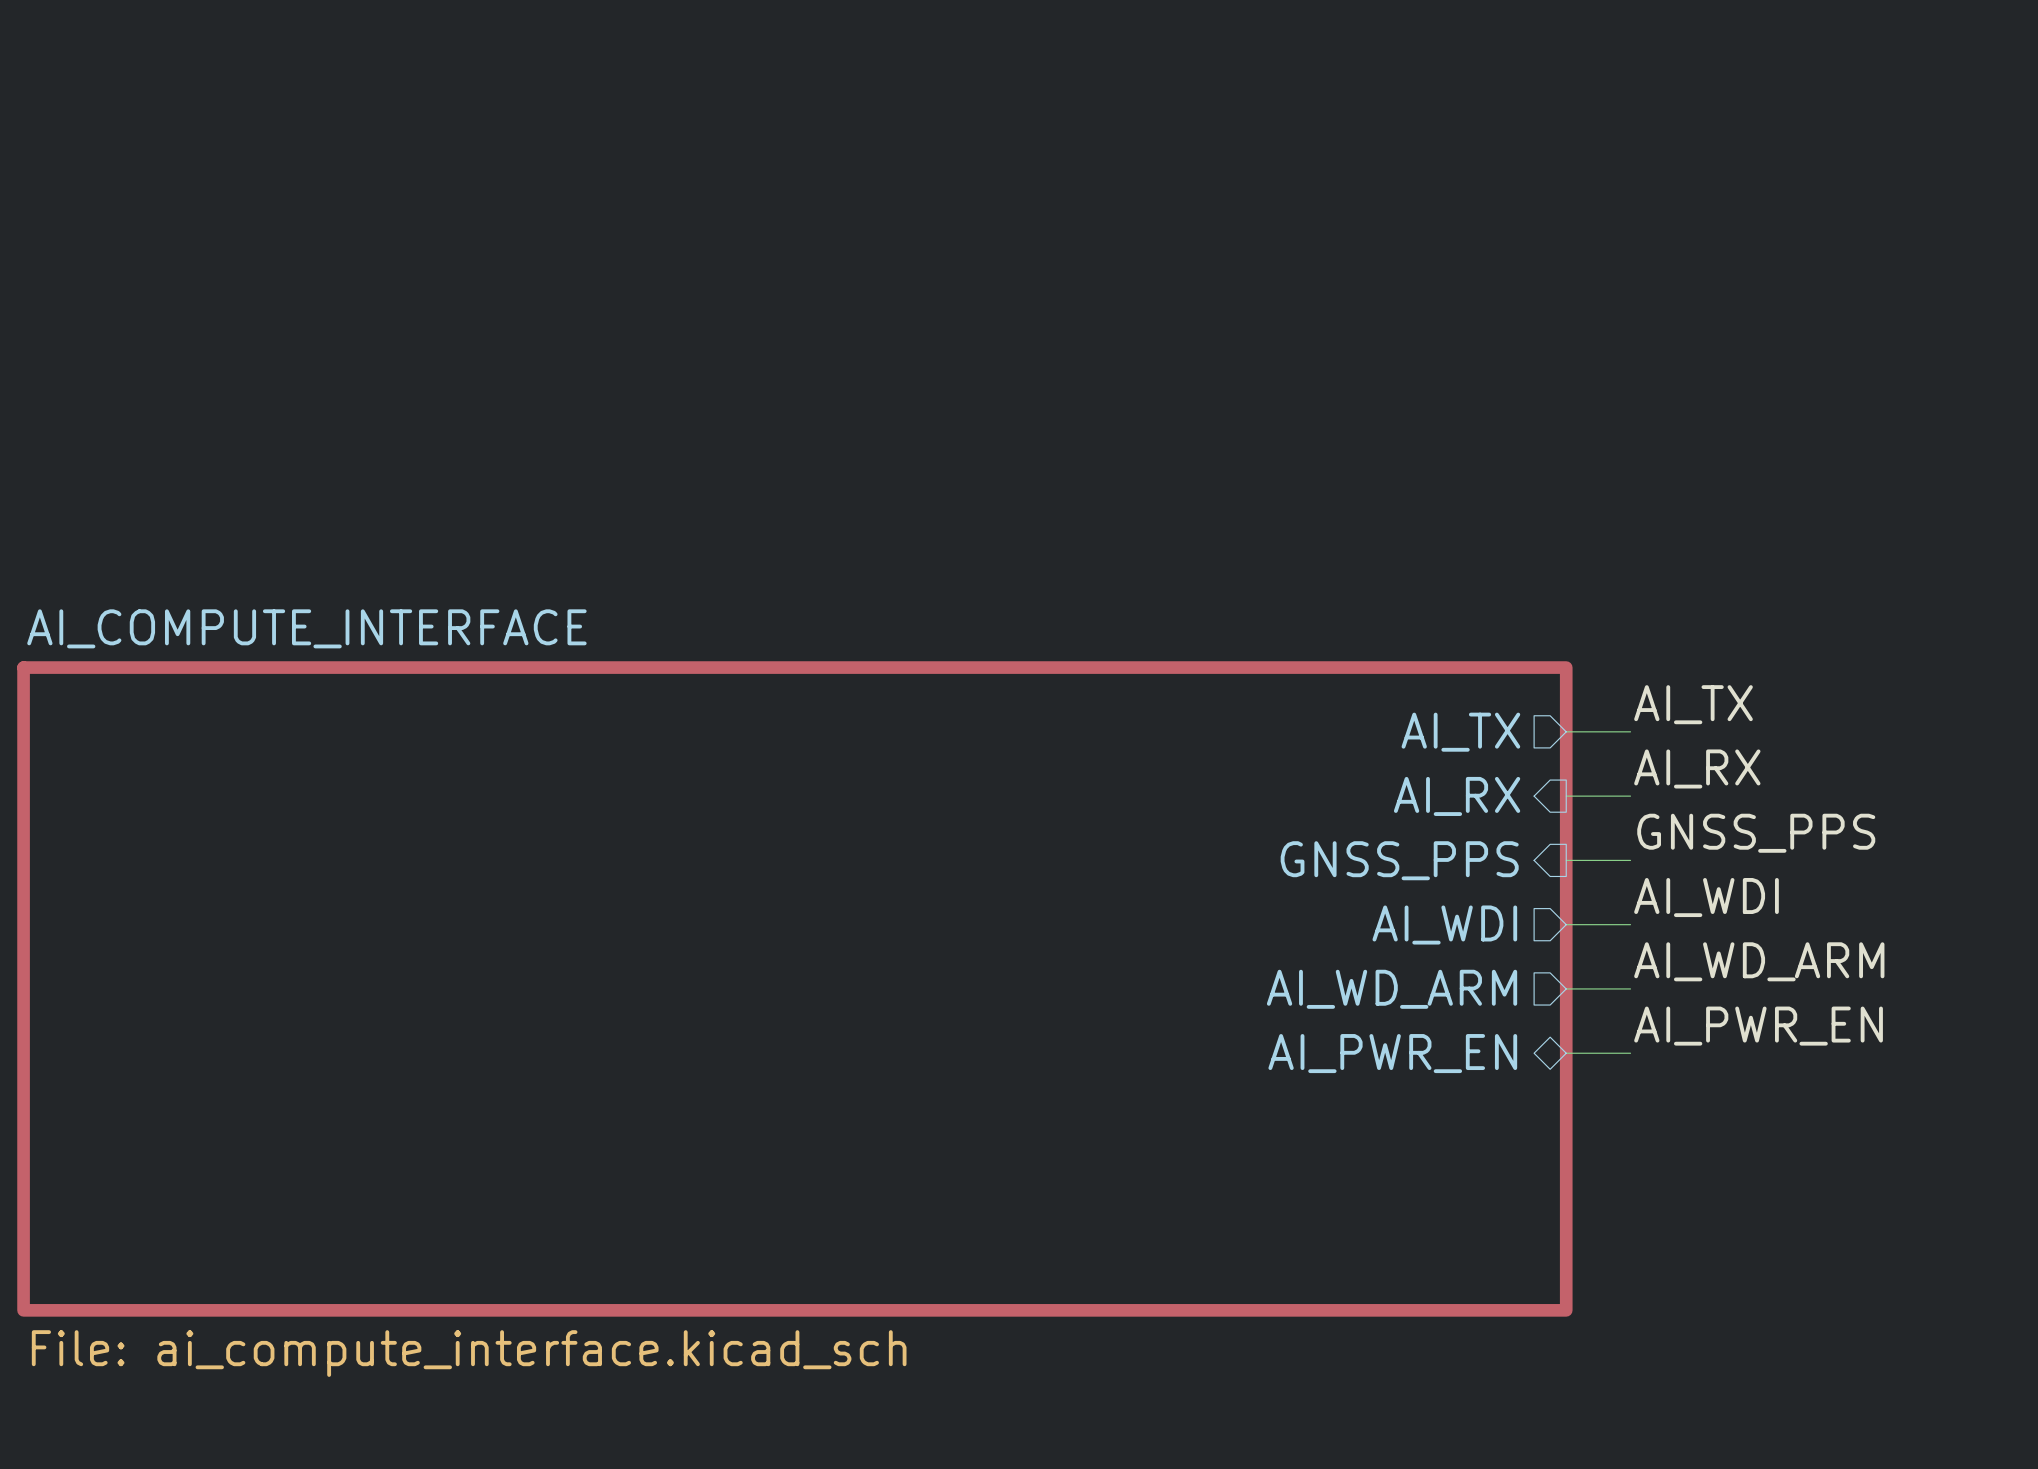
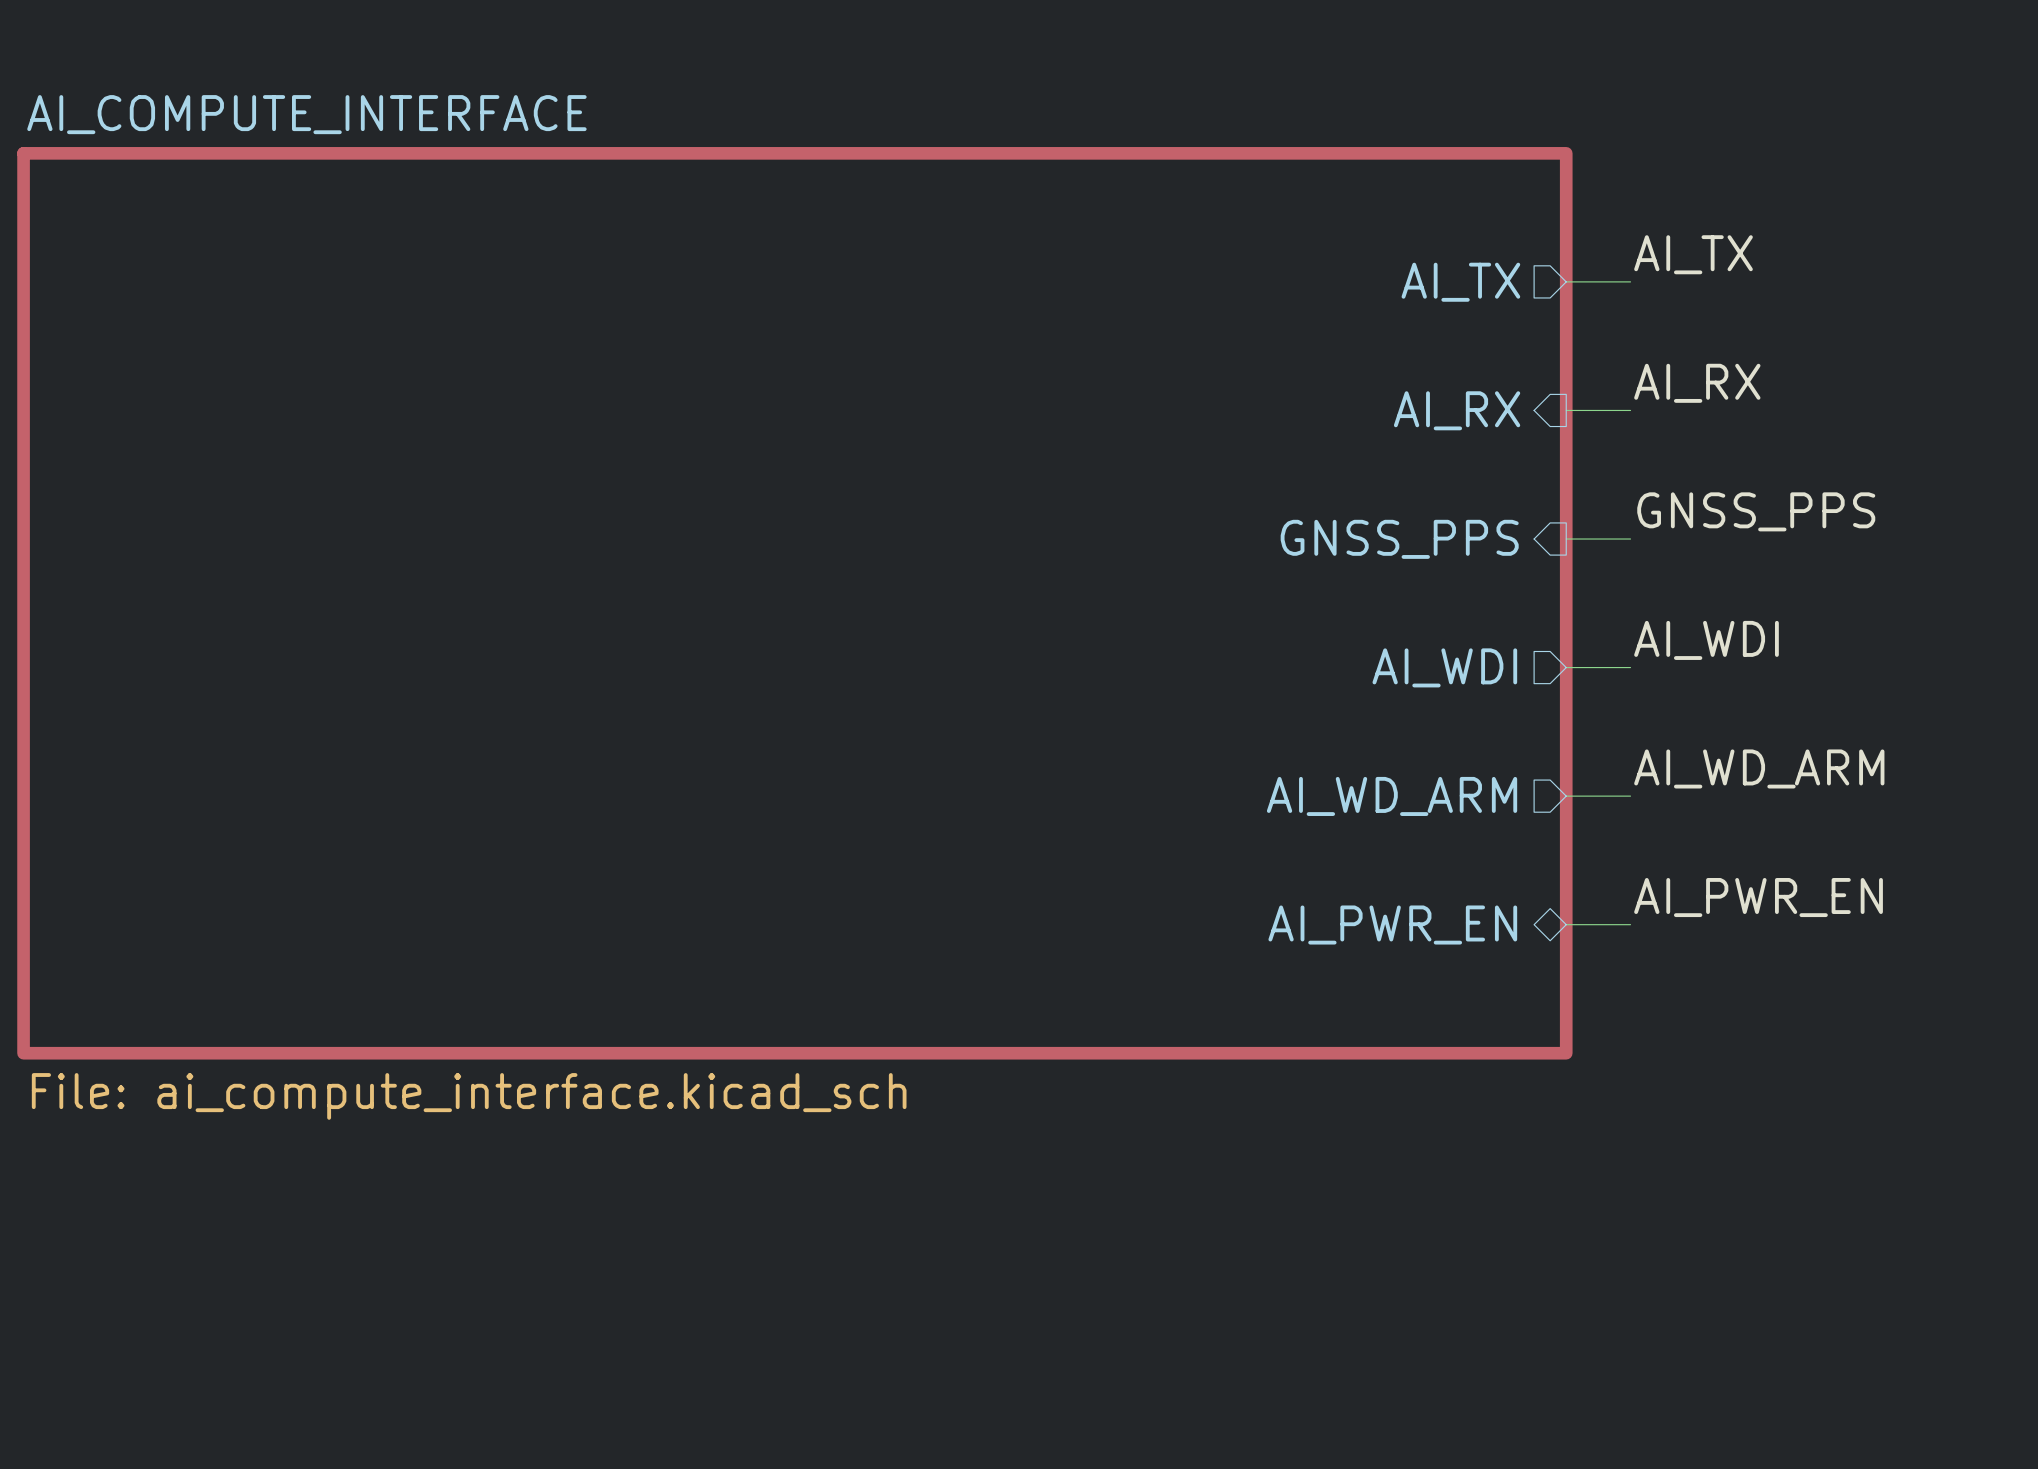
wire: none -> (1566, 281) (1630, 281)
label: none -> AI_RX (1697, 383)
sheet pin: none -> AI_RX (1457, 410)
sheet AI_COMPUTE_INTERFACE: none -> File: ai_compute_interface.kicad_sch (794, 603)
label: none -> AI_WDI (1706, 640)
sheet pin: none -> AI_WDI (1444, 667)
label position: AI_TX (1693, 704) -> AI_TX (1693, 254)
wire: (1566, 731) (1630, 731) -> (1566, 410) (1630, 410)
sheet pin position: AI_TX (1460, 732) -> AI_TX (1460, 282)
label: AI_RX (1697, 768) -> AI_WD_ARM (1759, 768)
sheet pin shape: input (1457, 796) -> output (1392, 796)
sheet pin: AI_RX (1457, 796) -> AI_WD_ARM (1392, 796)
label position: GNSS_PPS (1756, 833) -> GNSS_PPS (1756, 511)
sheet pin position: GNSS_PPS (1399, 860) -> GNSS_PPS (1399, 539)
wire: (1566, 860) (1630, 860) -> (1566, 539) (1630, 539)
label: AI_WDI (1706, 897) -> AI_PWR_EN (1758, 897)
sheet pin shape: output (1444, 925) -> bidirectional (1392, 925)
sheet pin: AI_WDI (1444, 925) -> AI_PWR_EN (1392, 925)
label: AI_WD_ARM (1759, 961) -> none
sheet AI_COMPUTE_INTERFACE: File: ai_compute_interface.kicad_sch (794, 988) -> none
wire: (1566, 988) (1630, 988) -> (1566, 667) (1630, 667)
sheet pin: AI_WD_ARM (1392, 989) -> none
label: AI_PWR_EN (1758, 1026) -> none
sheet pin: AI_PWR_EN (1392, 1053) -> none
wire: (1566, 1053) (1630, 1053) -> none

